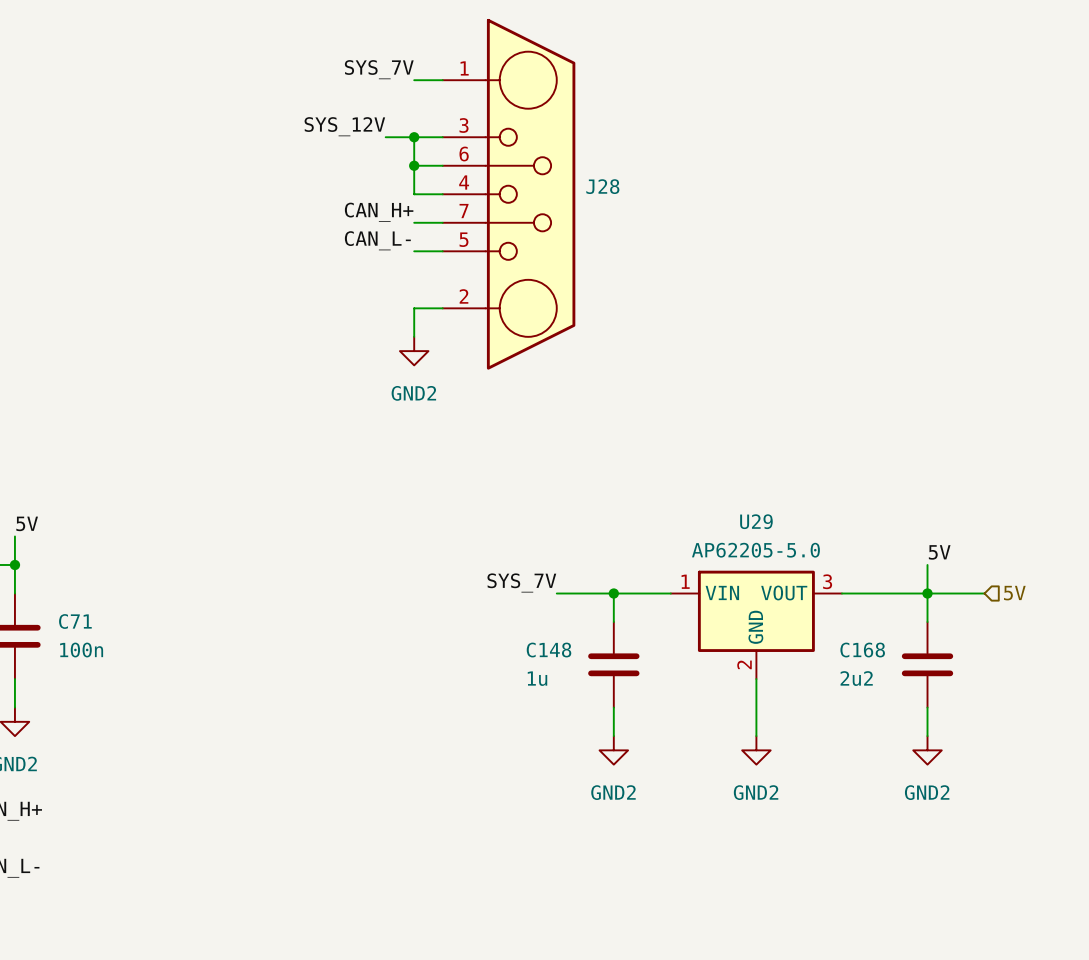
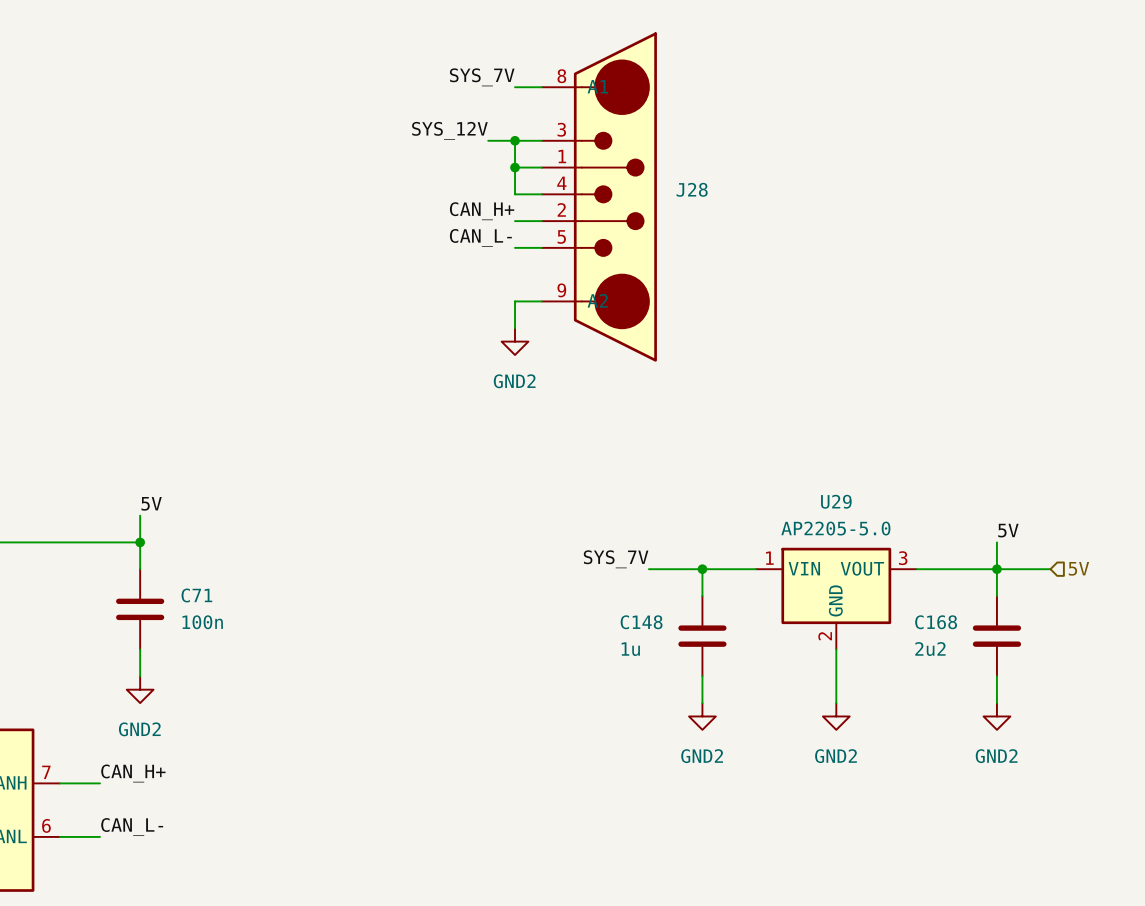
J28 symbol: [442, 18, 576, 370] -> [541, 32, 657, 362]
U29 value: AP62205-5.0 (755, 550) -> AP2205-5.0 (835, 528)

